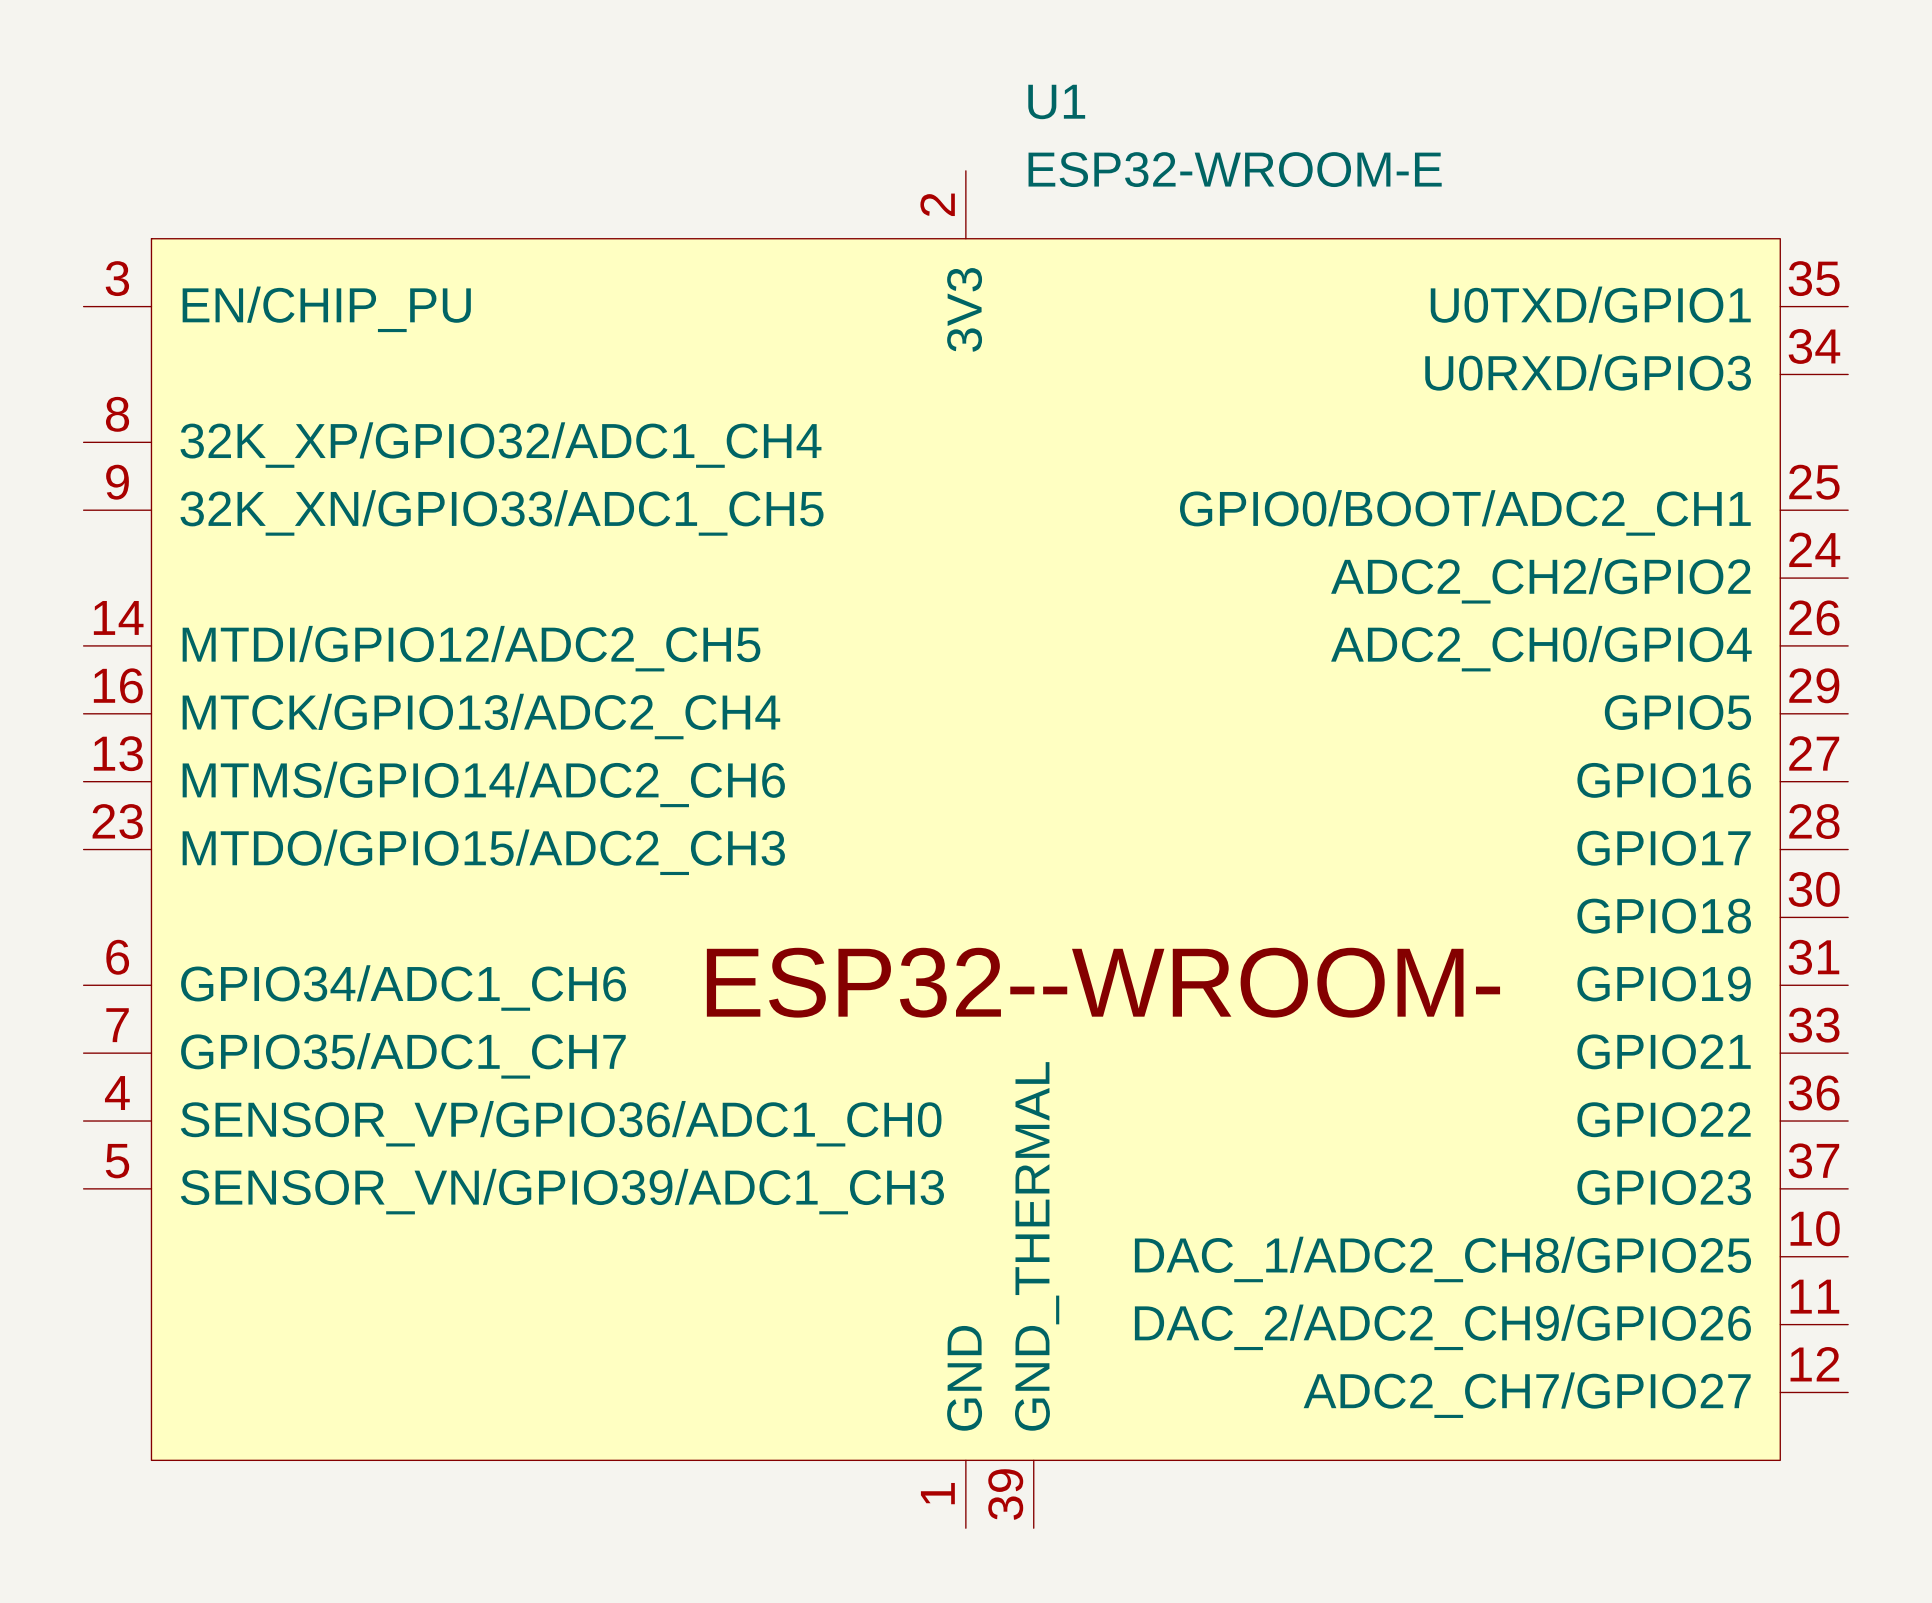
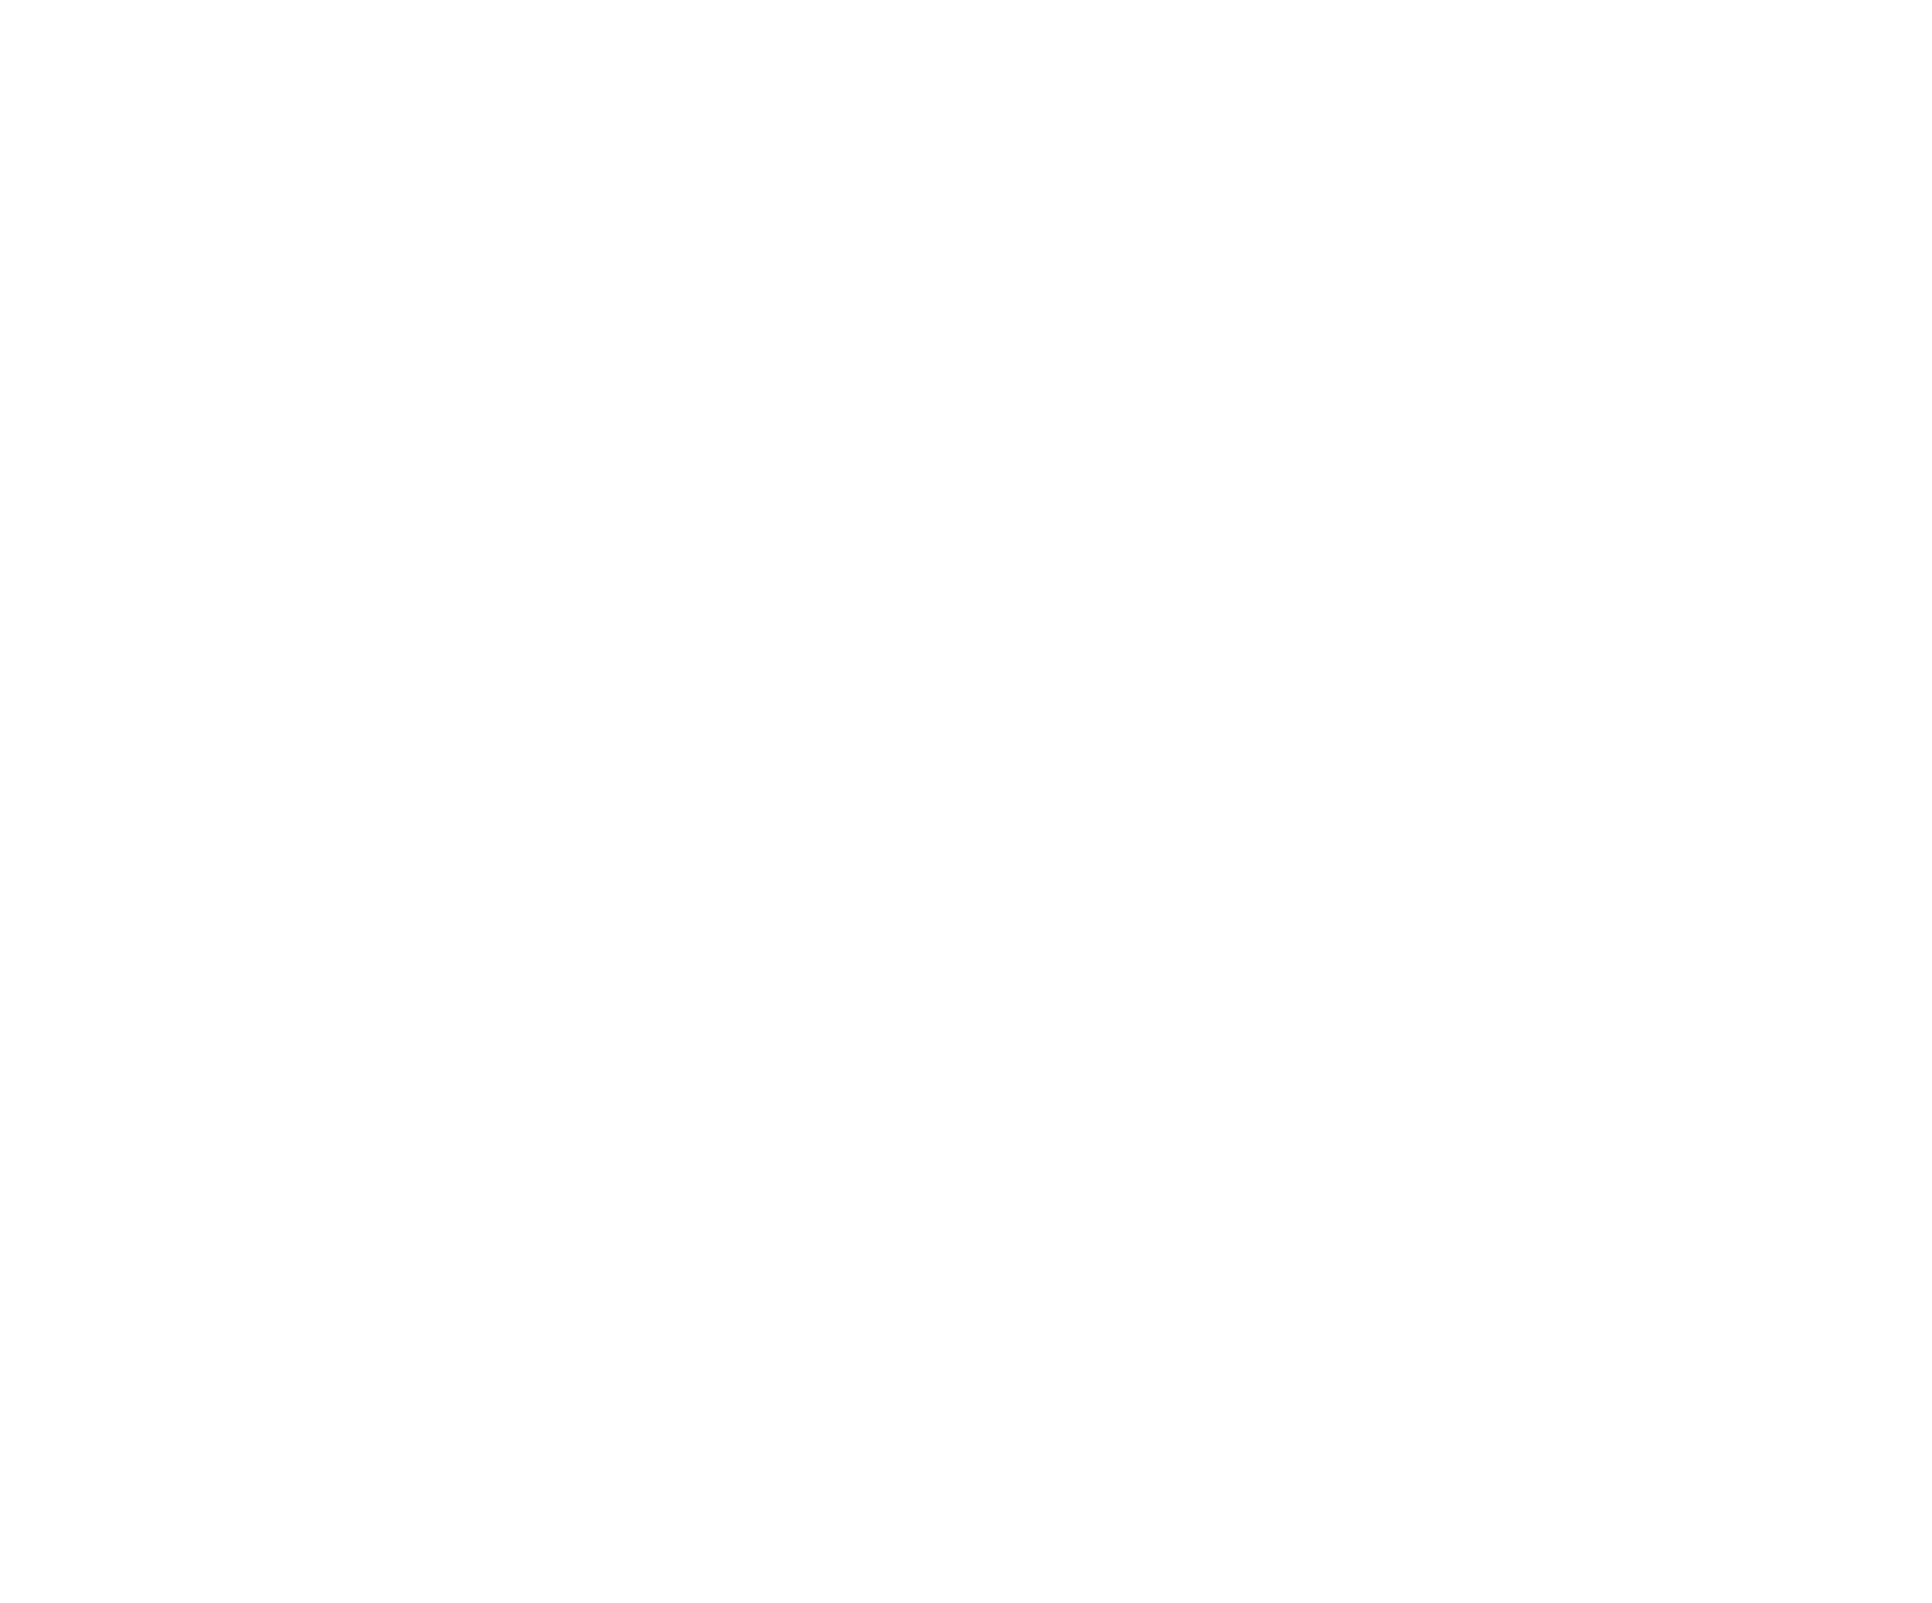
U1: ESP32-WROOM-E (965, 849) -> none

